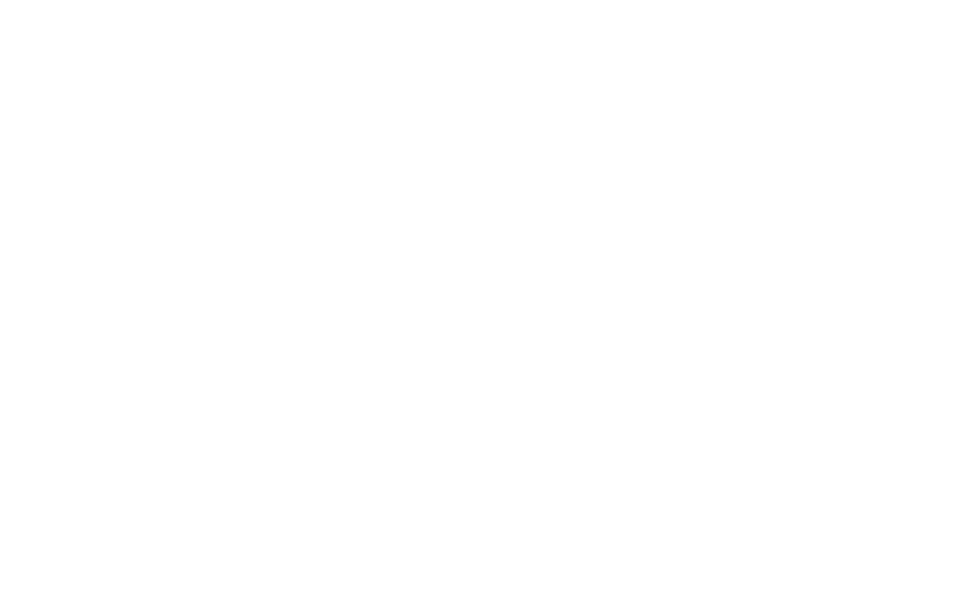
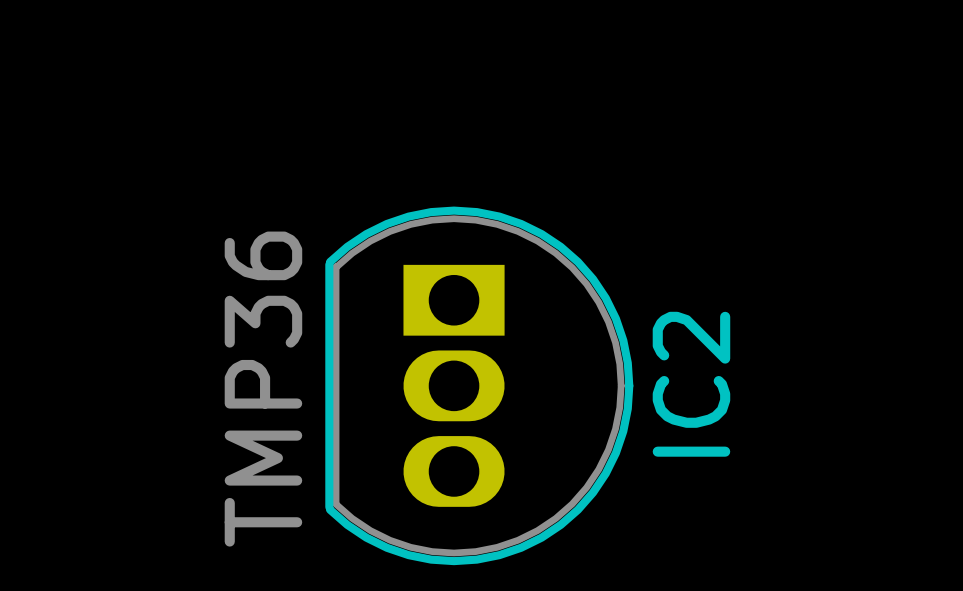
IC2: none -> TMP36 (479, 385)

